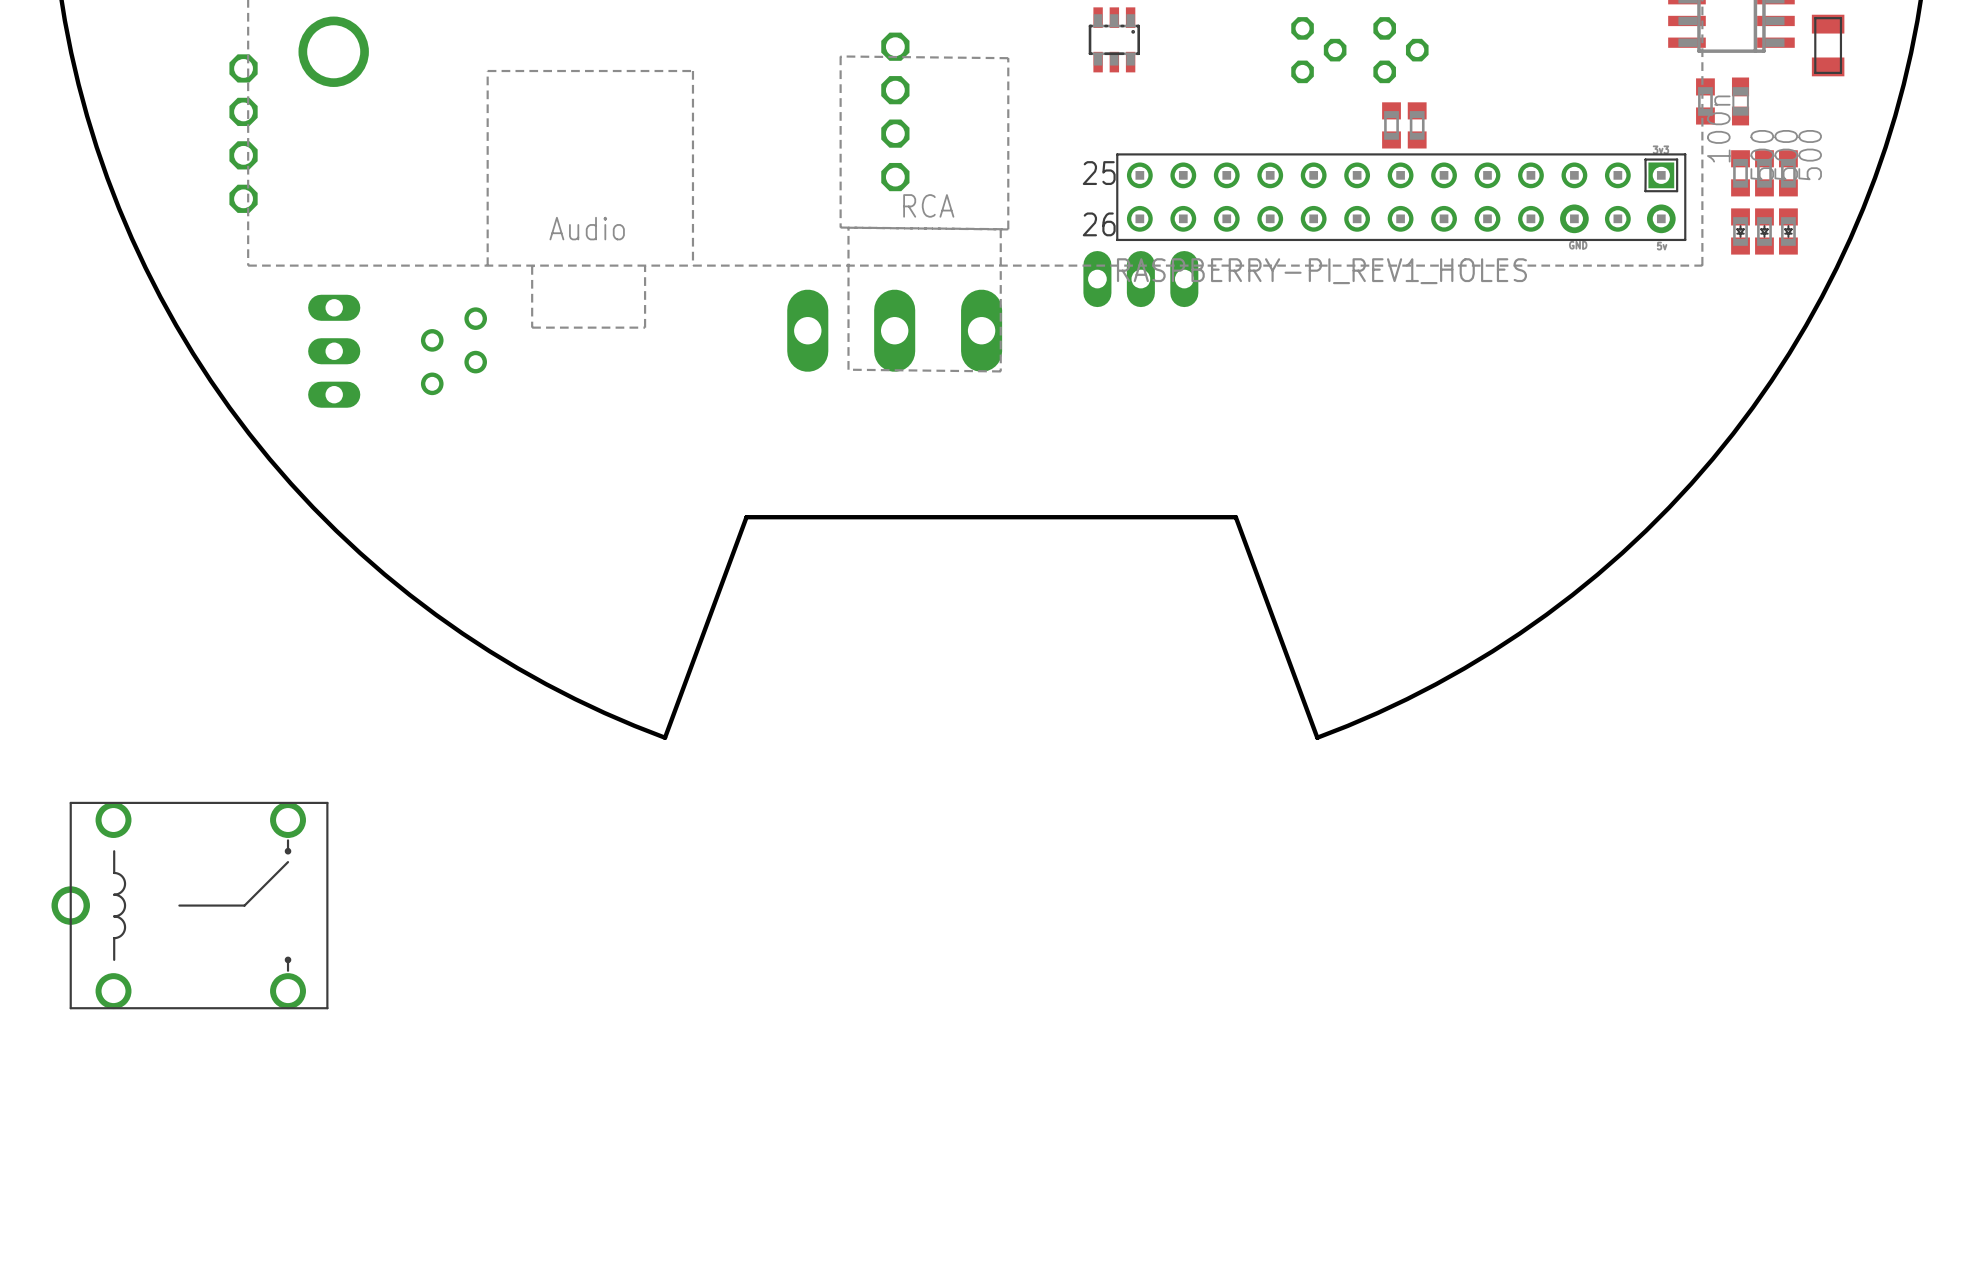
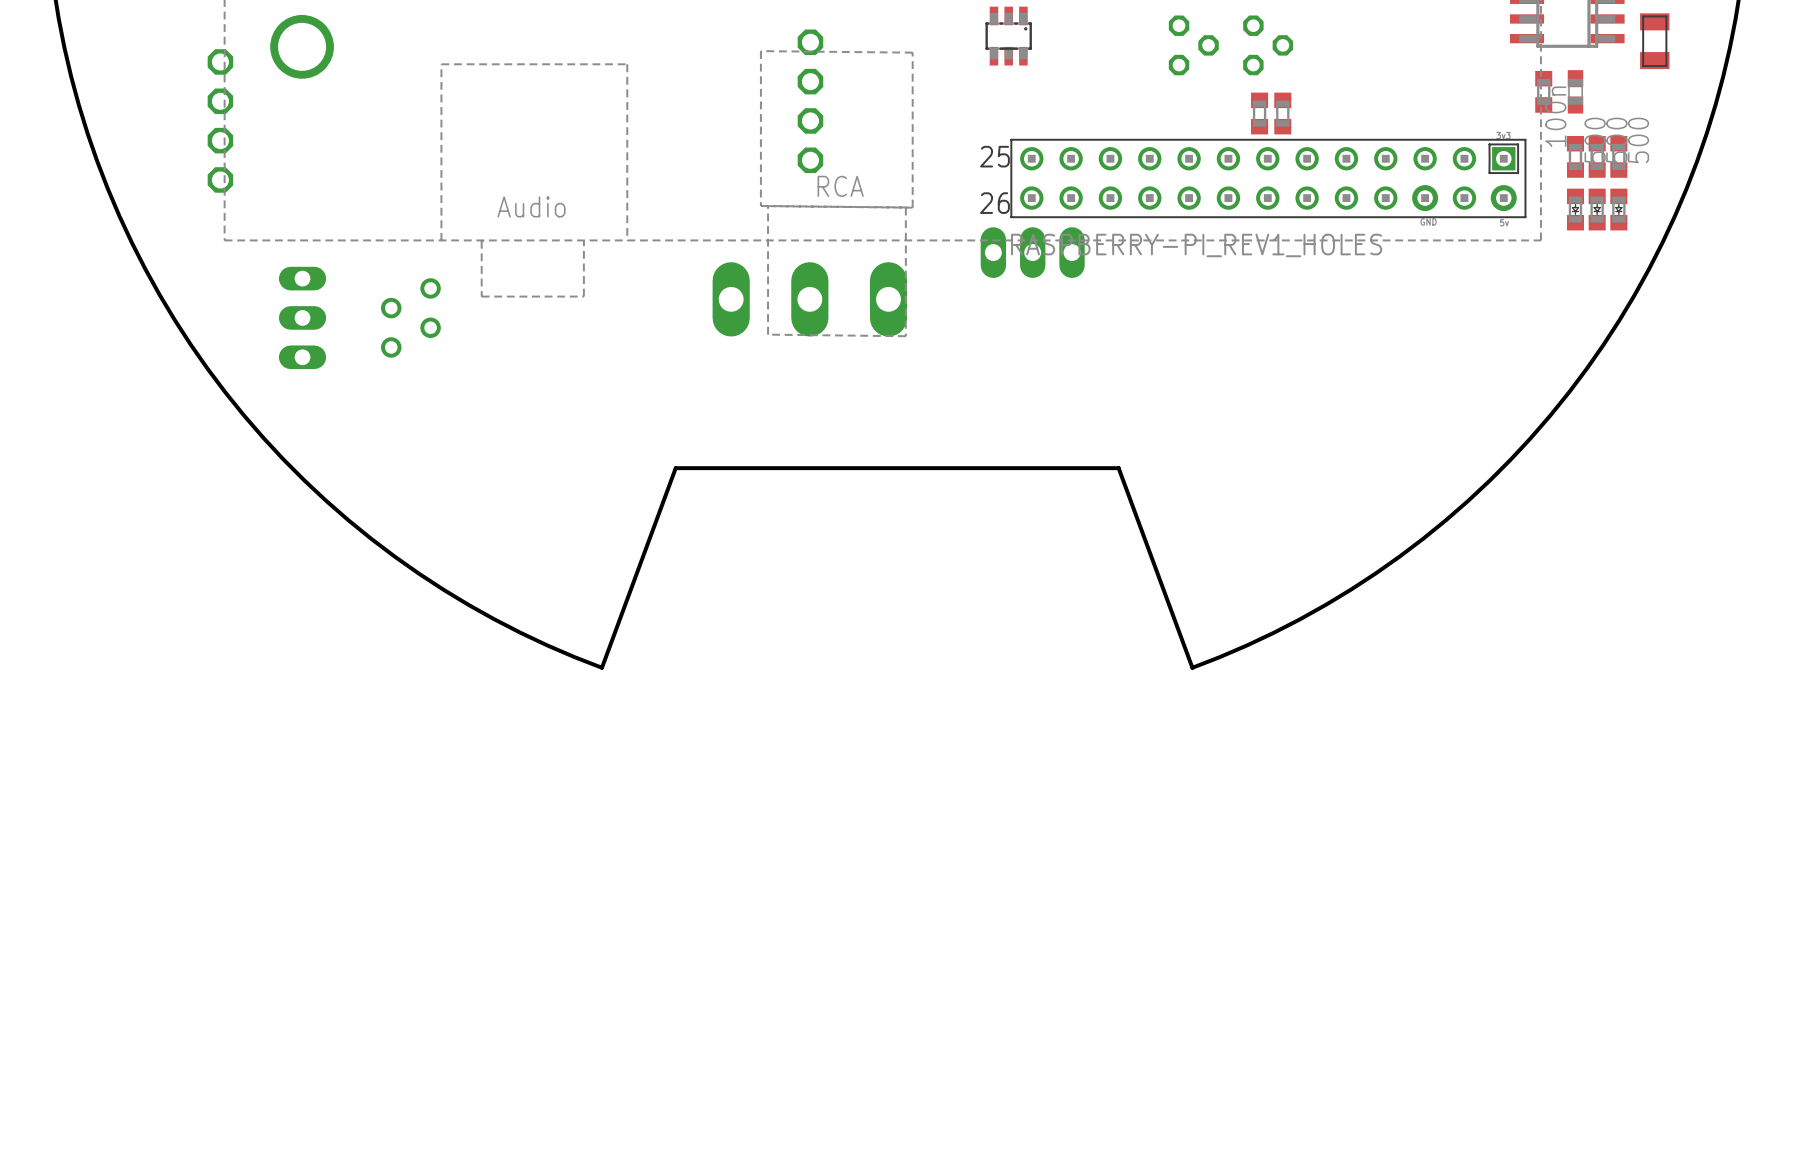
part: (189, 905) -> none

